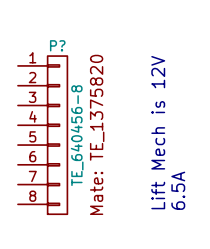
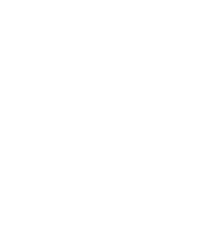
text: Lift Mech is 12V (158, 132) -> none
P?: TE_640456-8 (42, 135) -> none
text: 6.5A (178, 190) -> none

